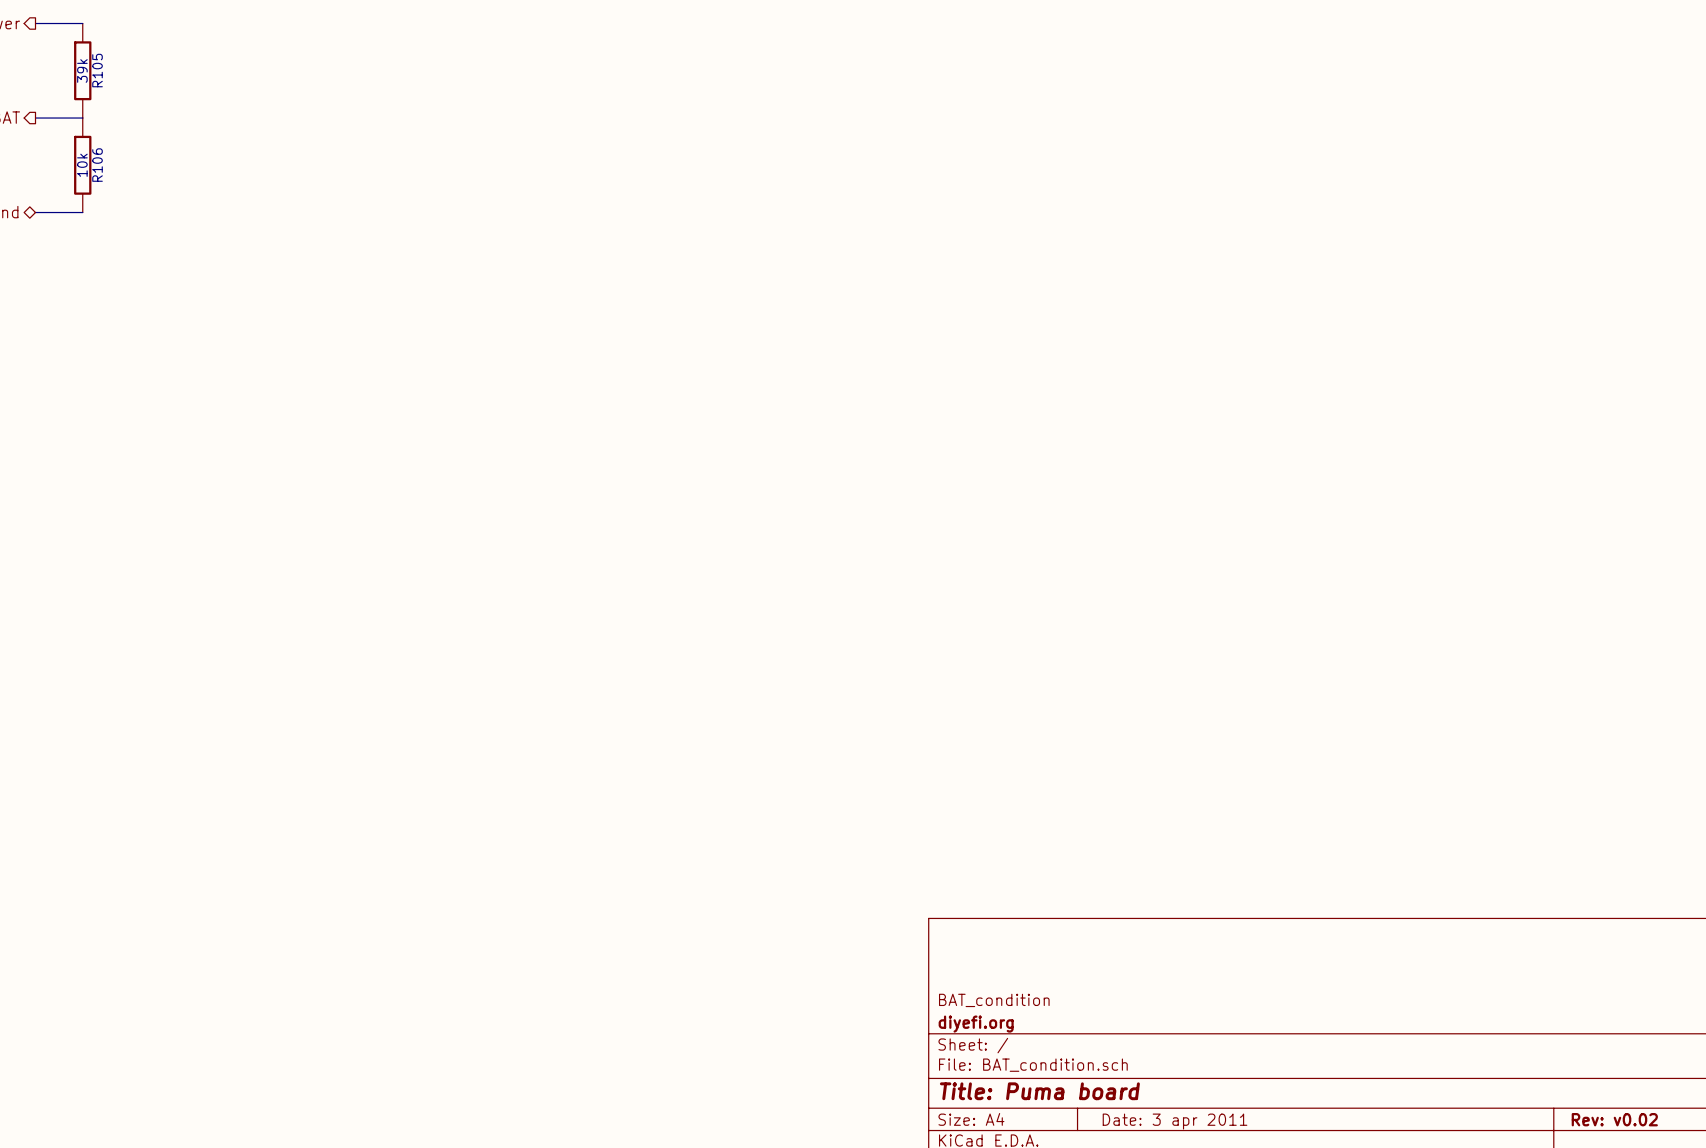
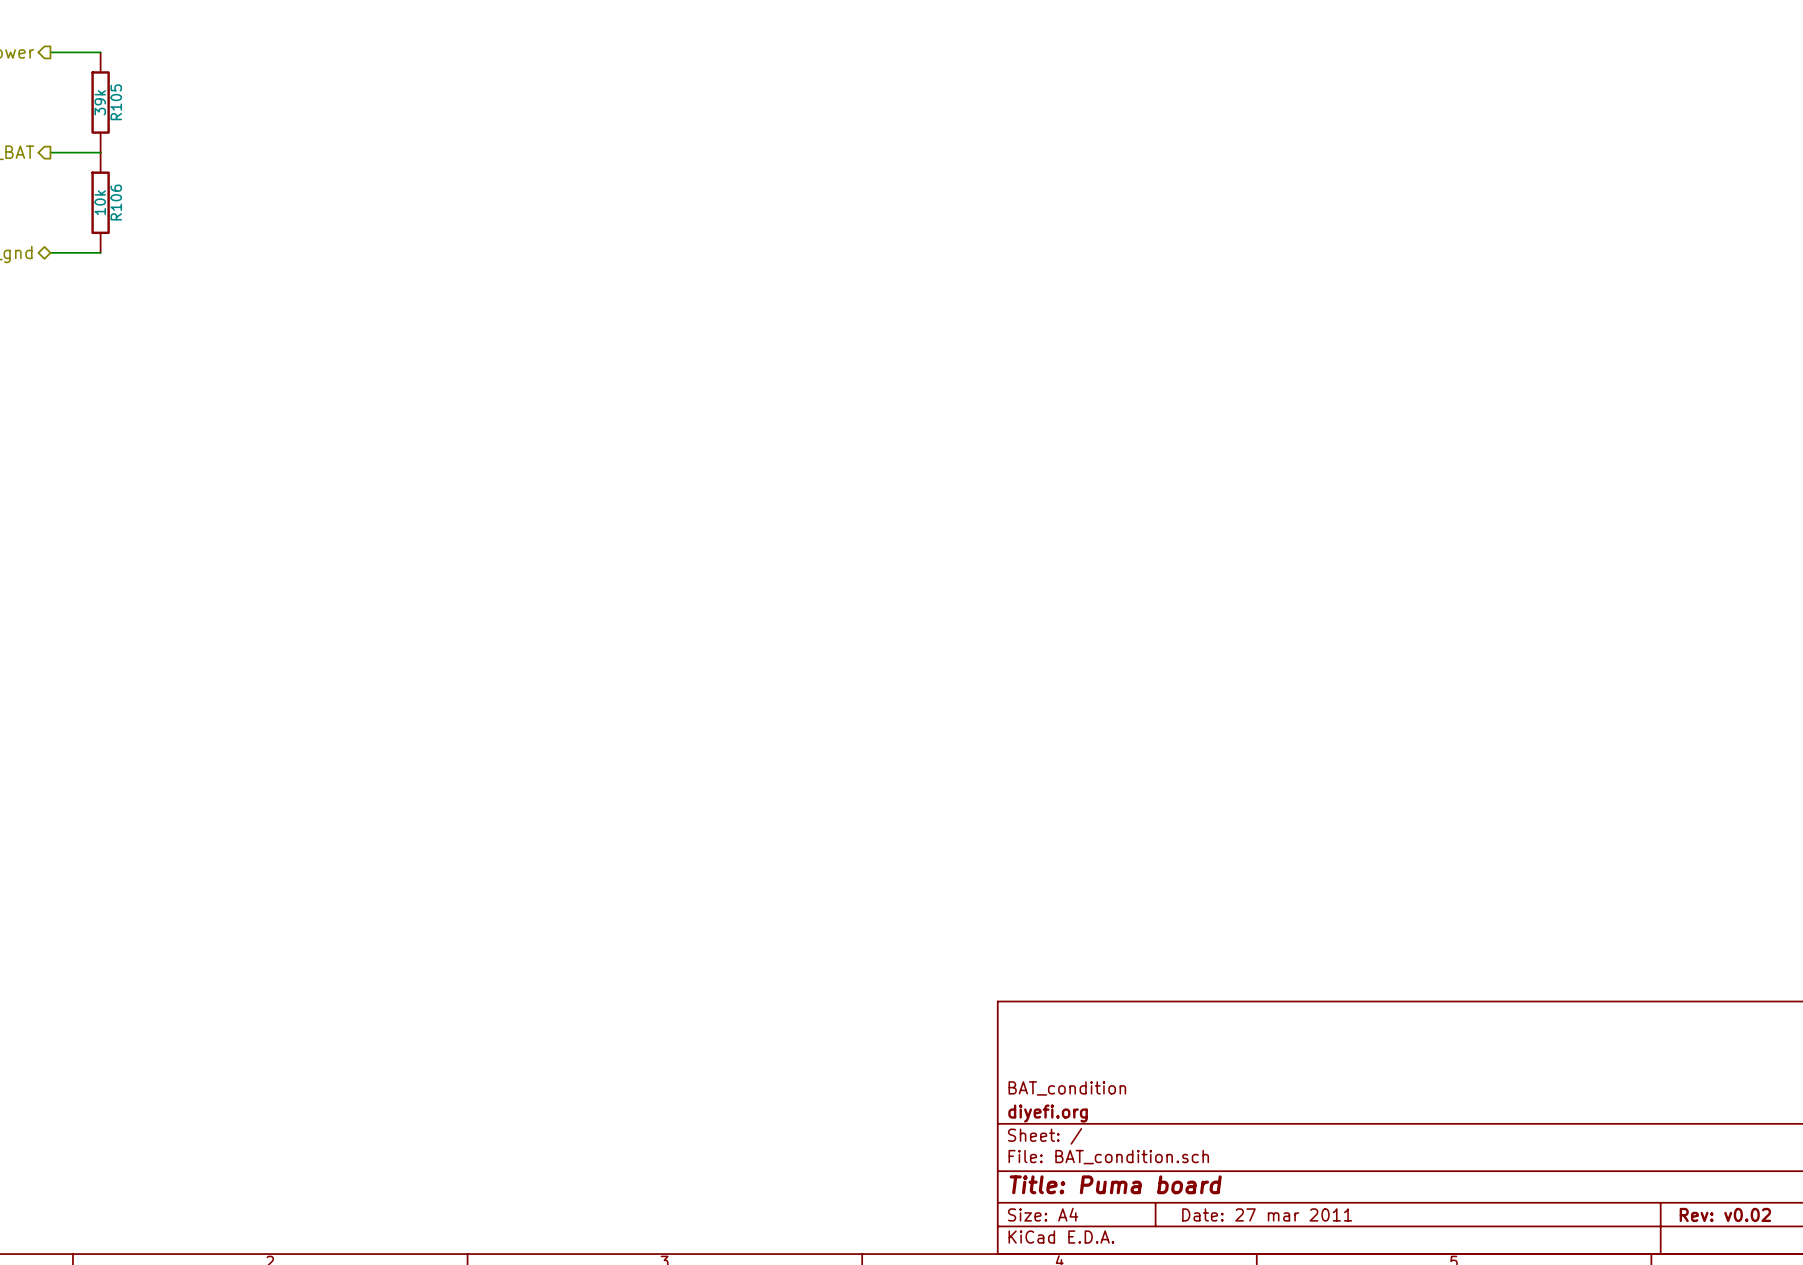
title block: Date: 3 apr 2011 (1175, 1121) -> Date: 27 mar 2011 (1267, 1214)

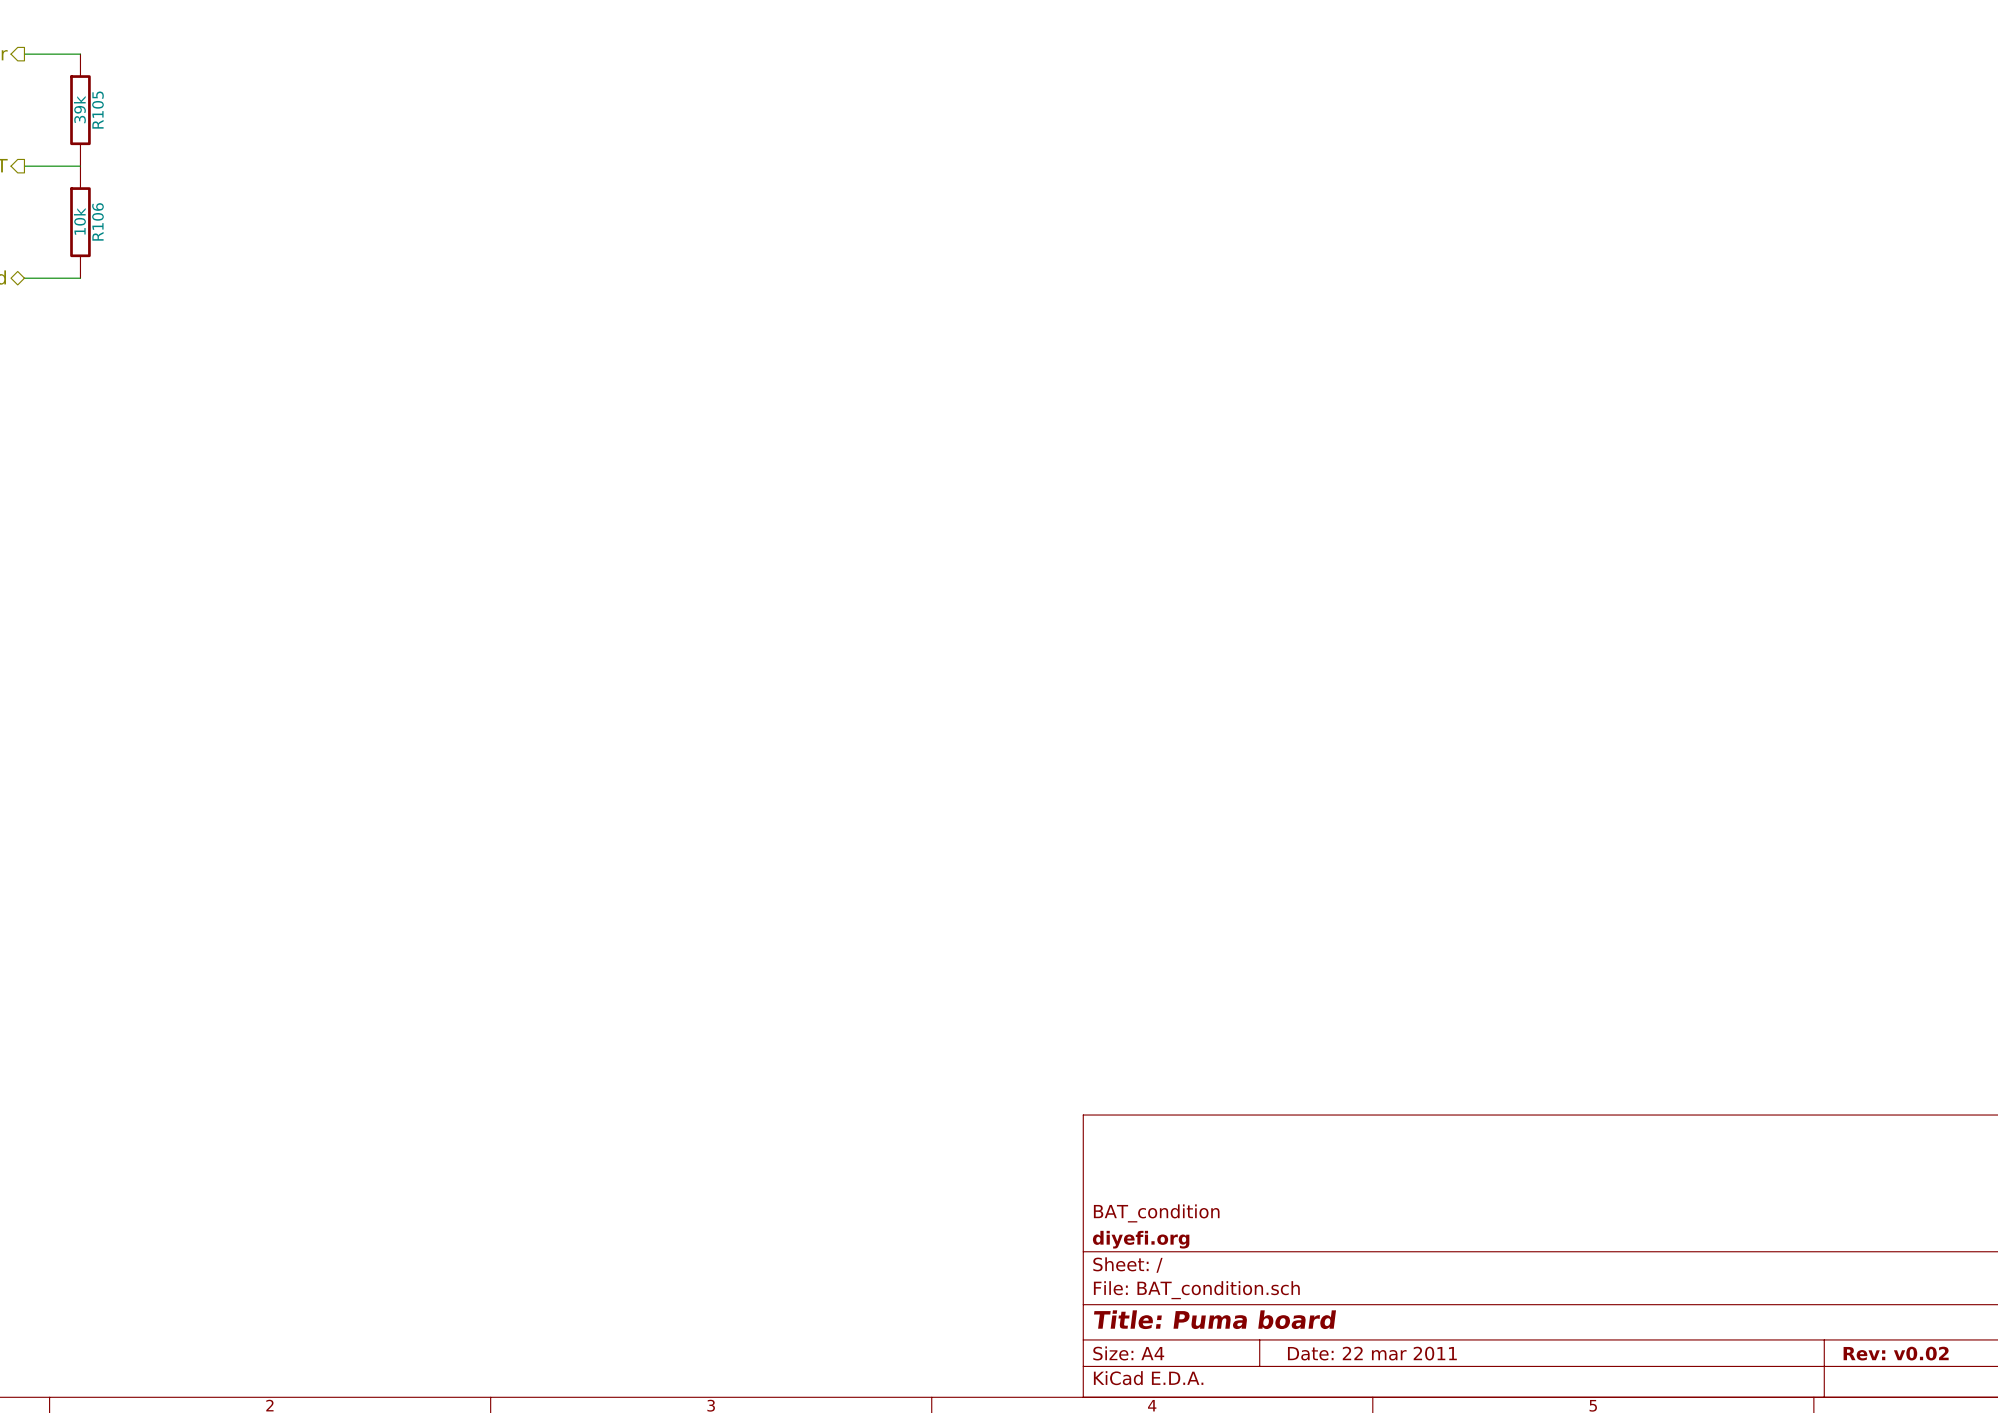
title block: Date: 27 mar 2011 (1267, 1214) -> Date: 22 mar 2011 (1372, 1353)

